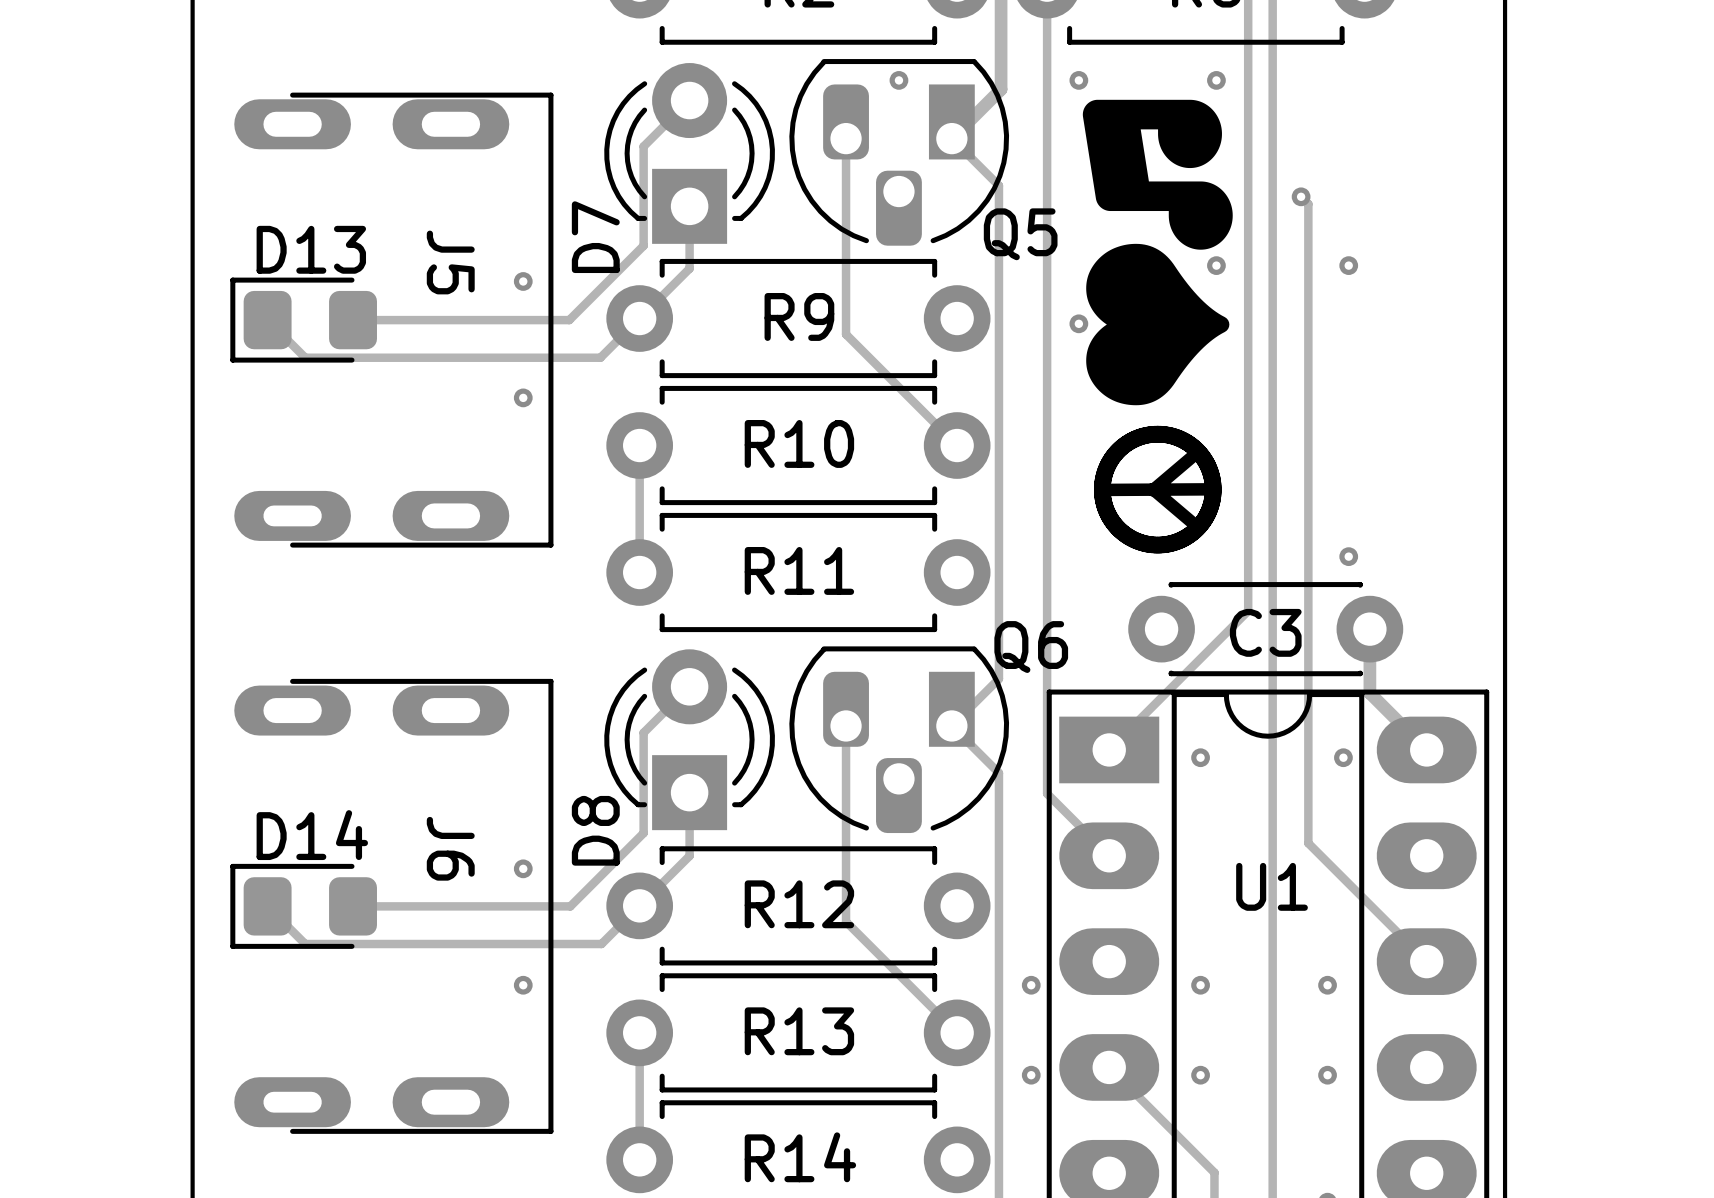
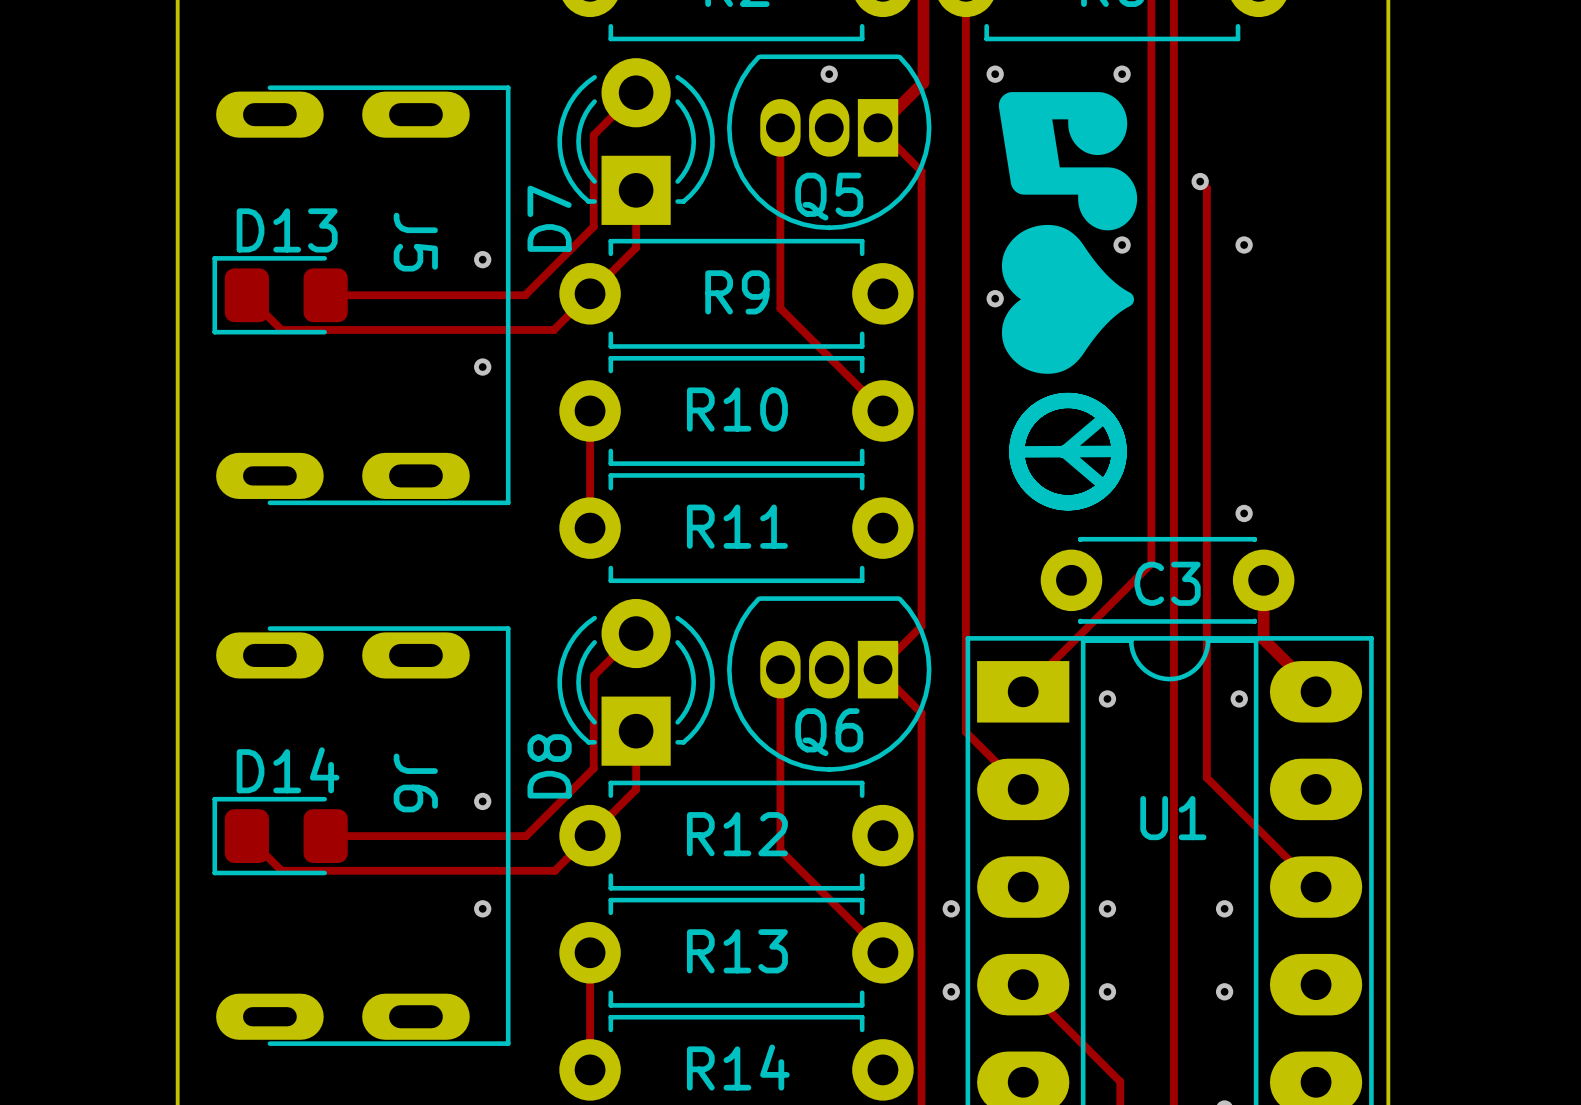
Q5 footprint: [789, 59, 1010, 246] -> [727, 54, 932, 231]
Q5 name position: Q5 (1020, 234) -> Q5 (829, 196)
Q6 footprint: [789, 646, 1010, 834] -> [727, 596, 932, 772]
Q6 name position: Q6 (1031, 647) -> Q6 (829, 732)

